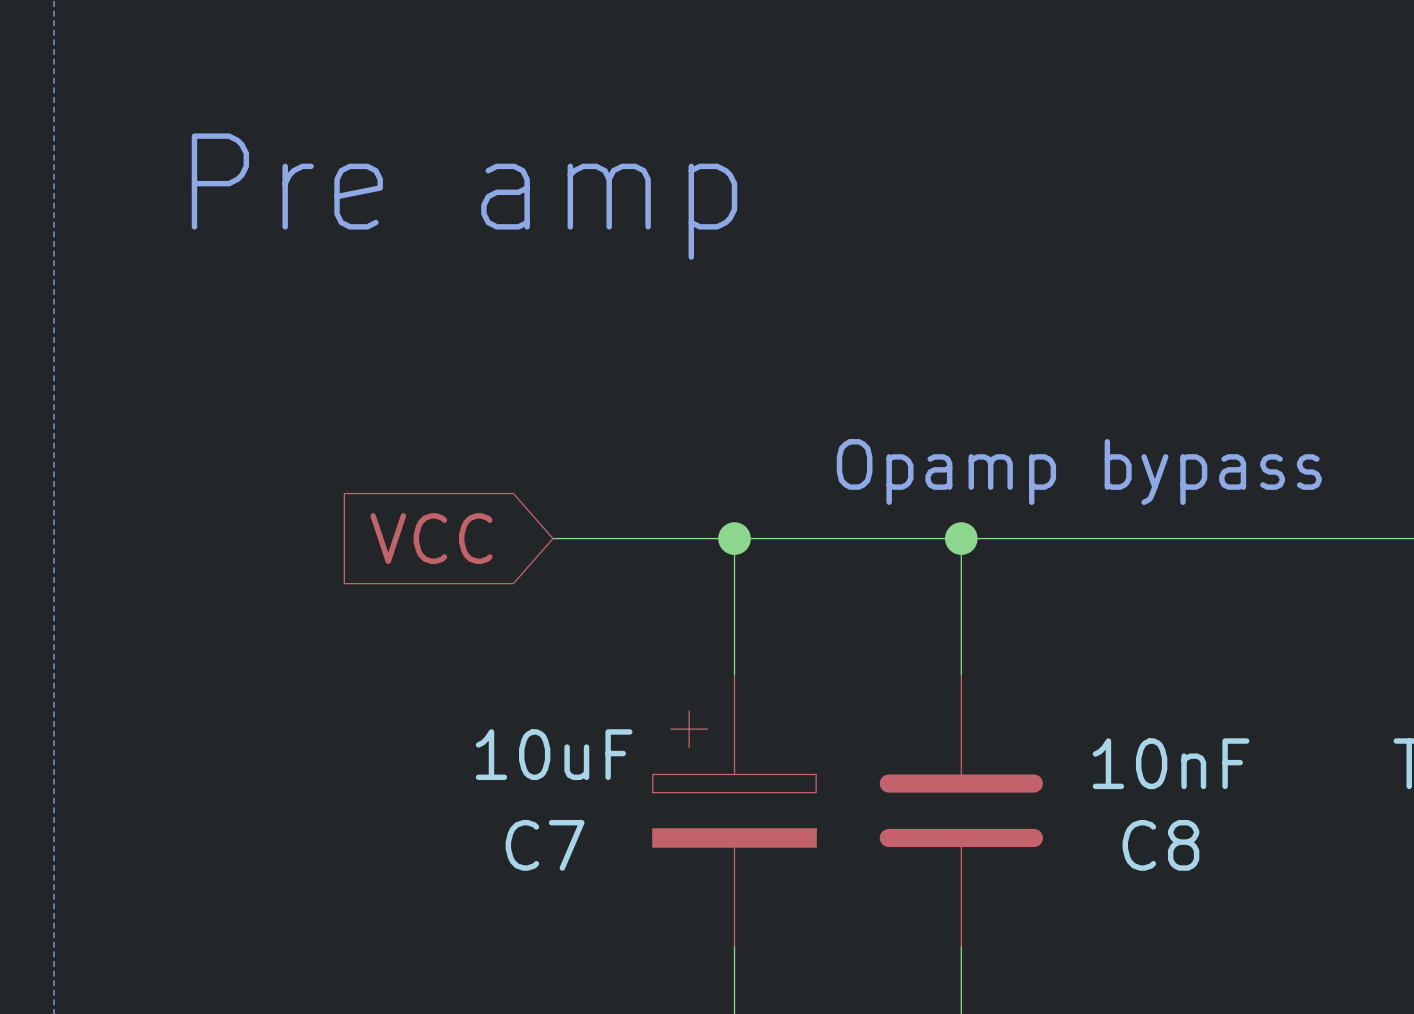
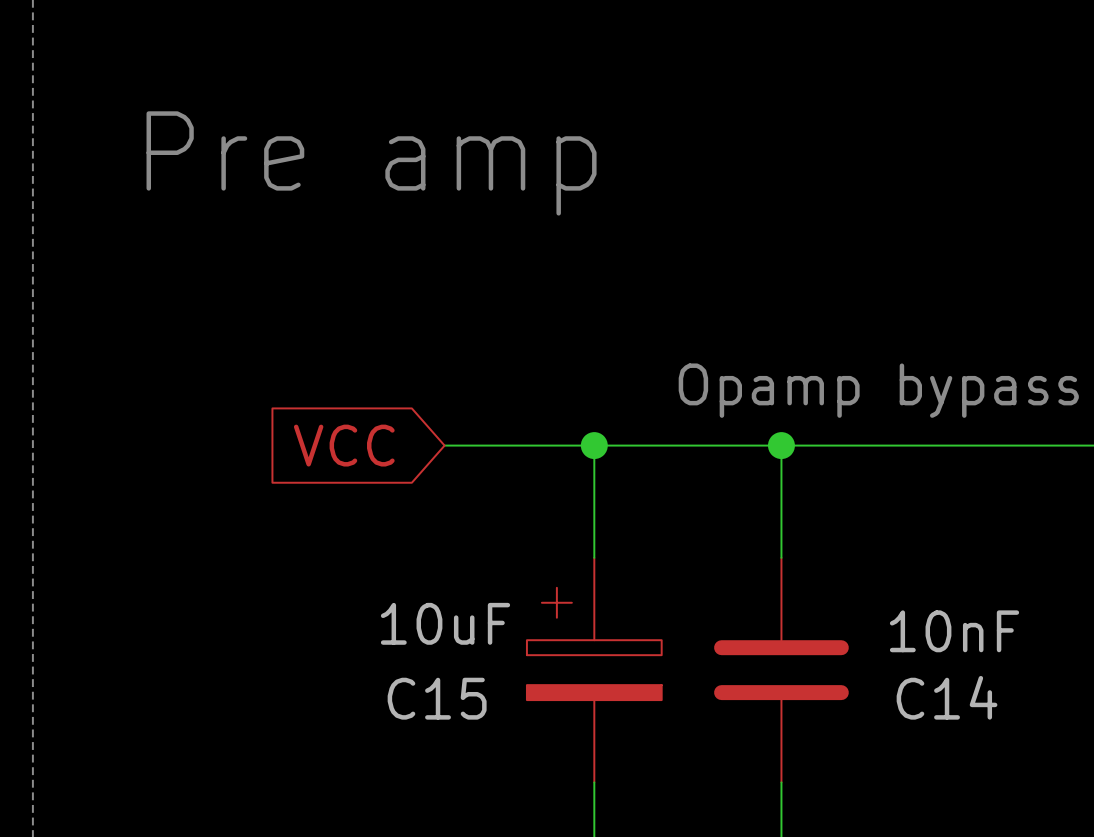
C7 name: C7 (545, 845) -> C15 (437, 698)
C8 name: C8 (1160, 845) -> C14 (947, 697)

